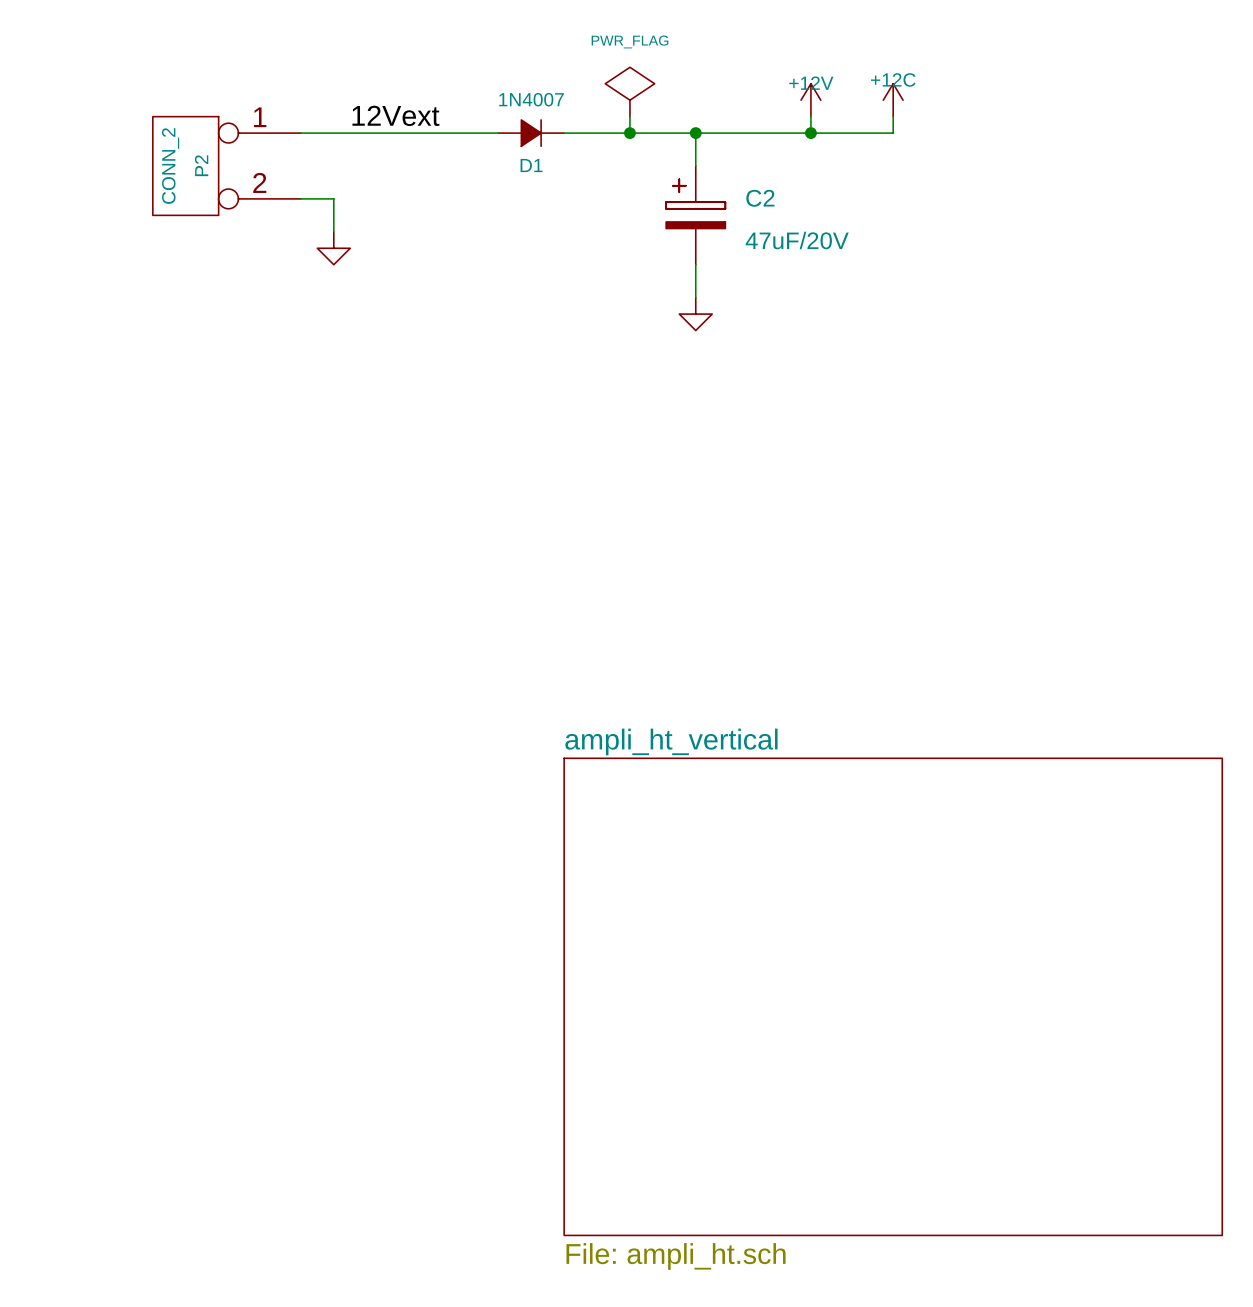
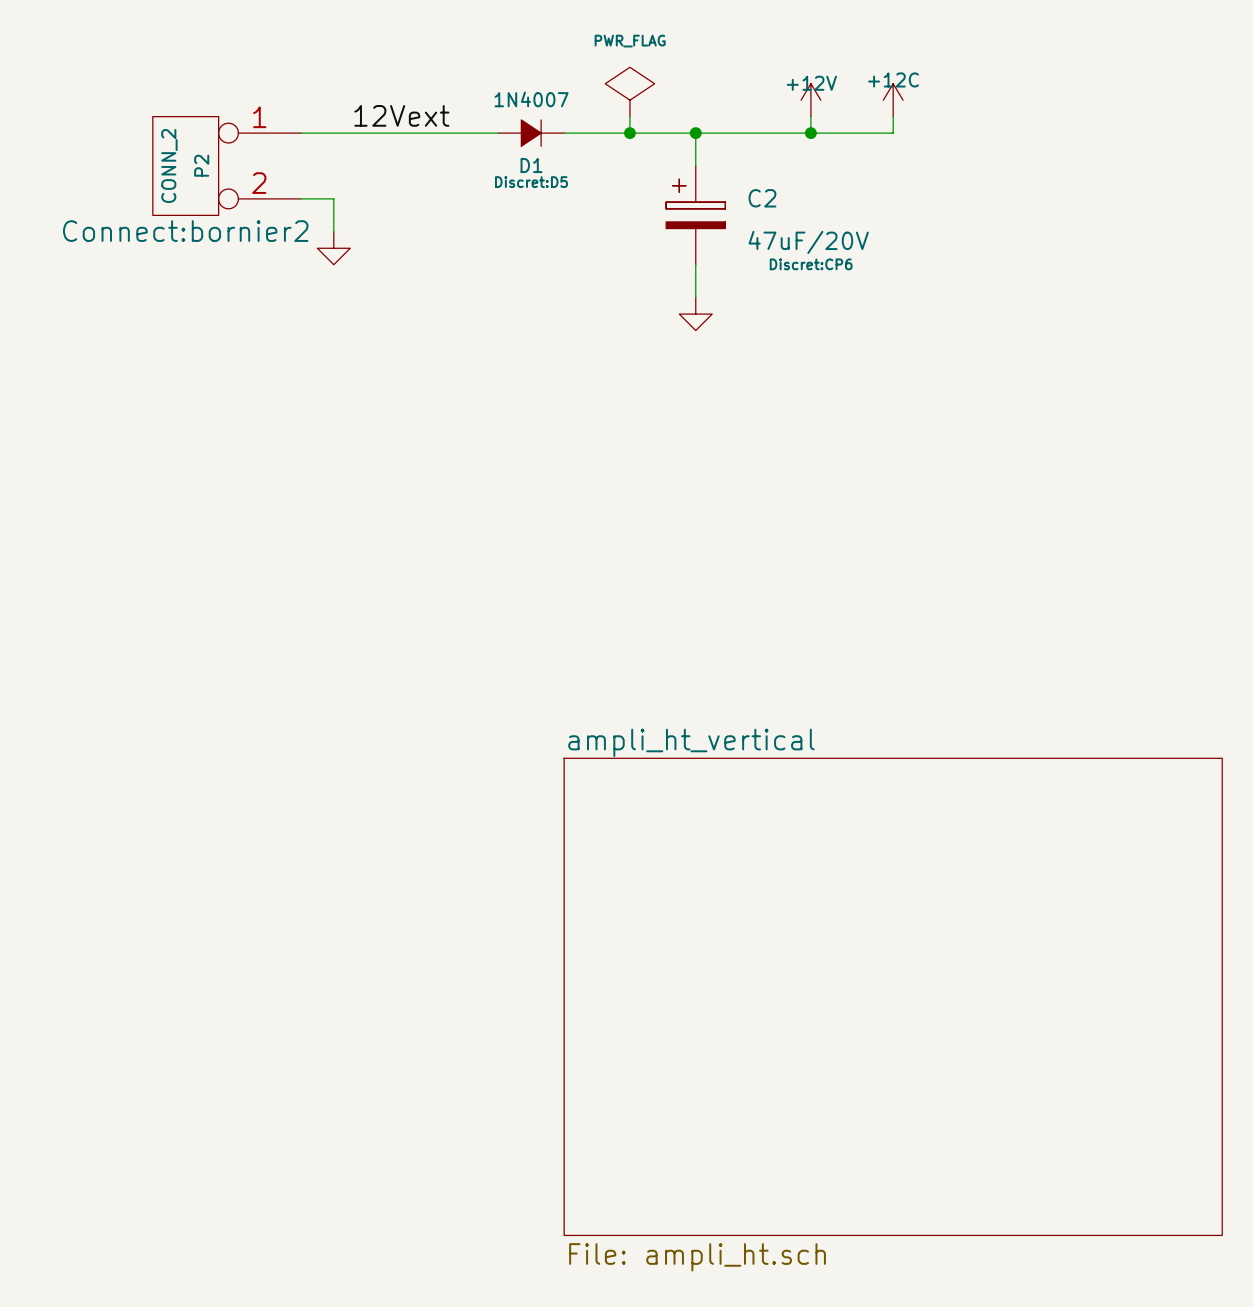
D1 text: none -> Discret:D5 (531, 182)
P2 text: none -> Connect:bornier2 (185, 231)
C2 text: none -> Discret:CP6 (811, 264)

